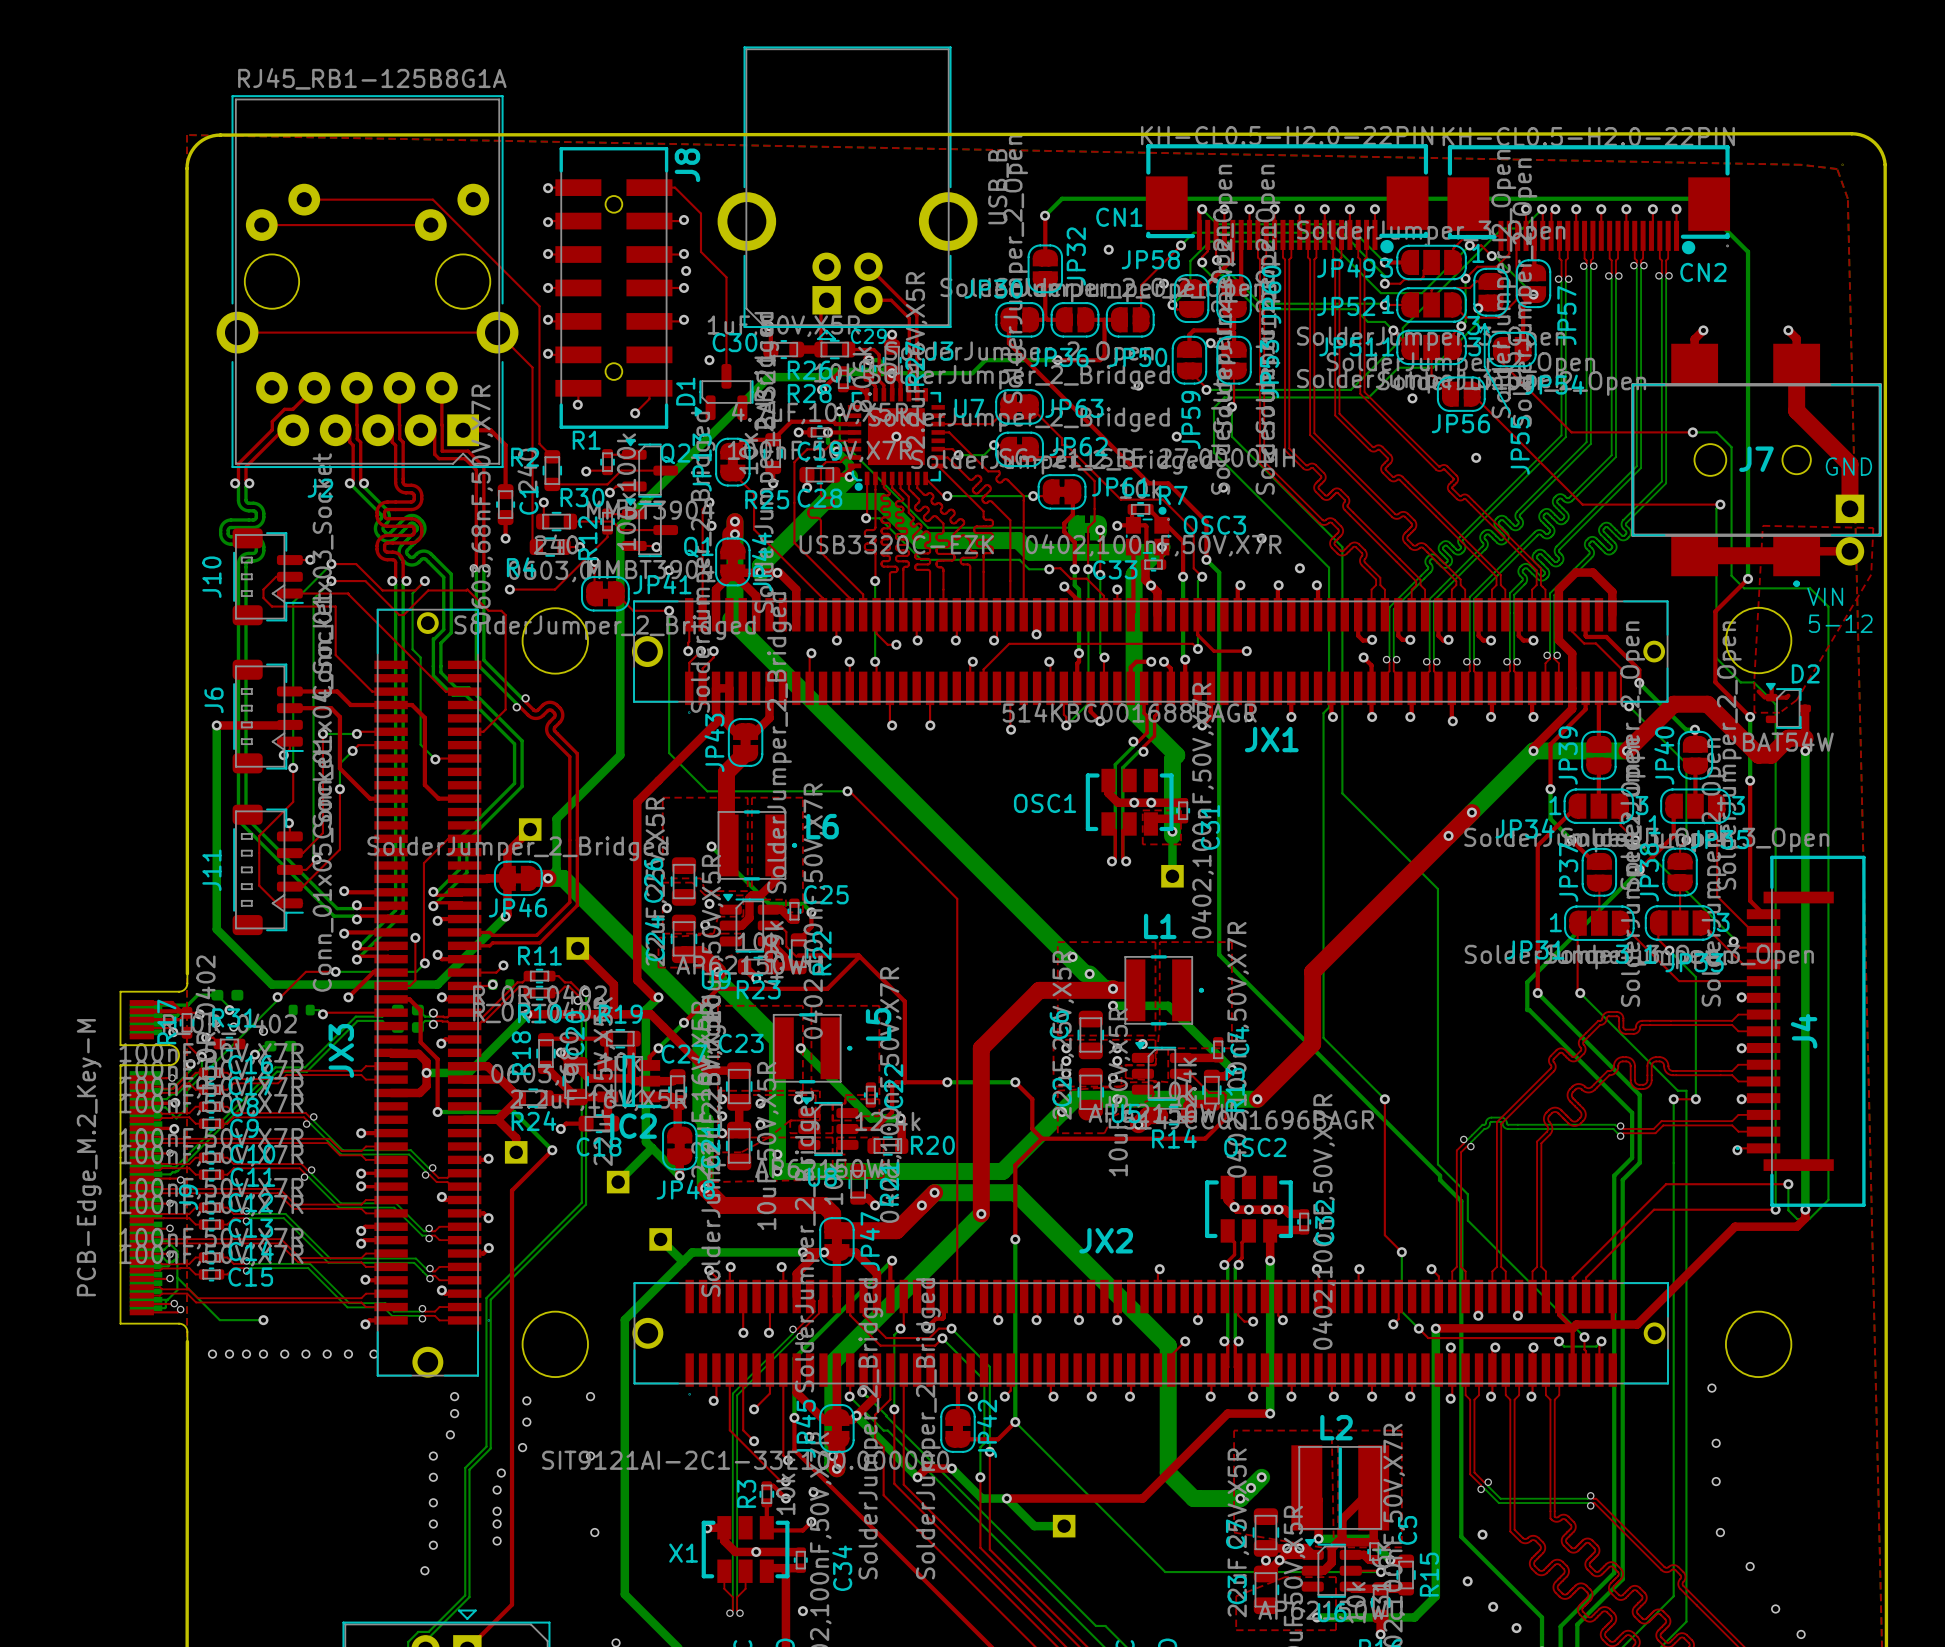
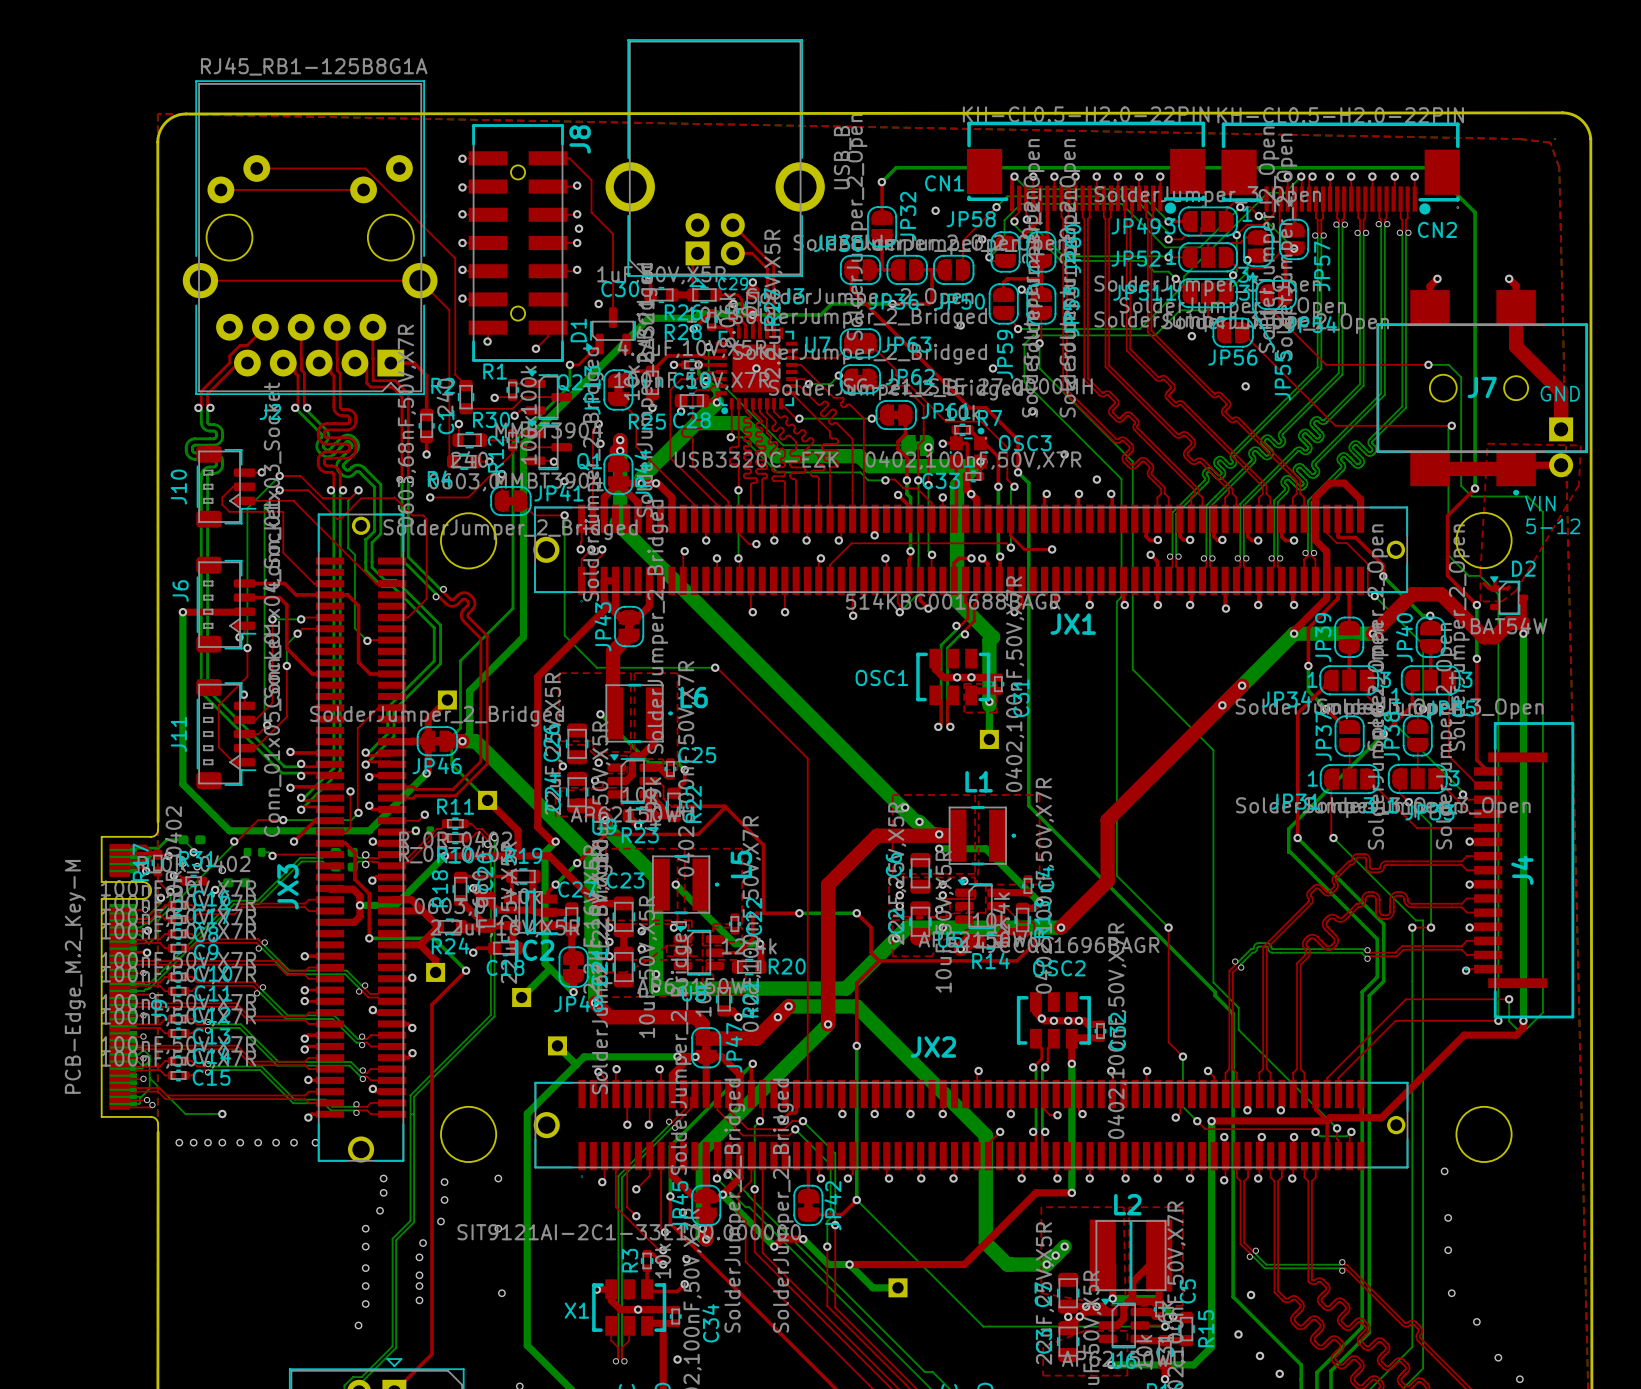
top track: none -> (599, 344) (578, 364) (569, 364)
bottom track: none -> (569, 364) (569, 385) (513, 442) (513, 608) (460, 660) (460, 728) (451, 736) (451, 764) (487, 800)
via: none -> (569, 364)

